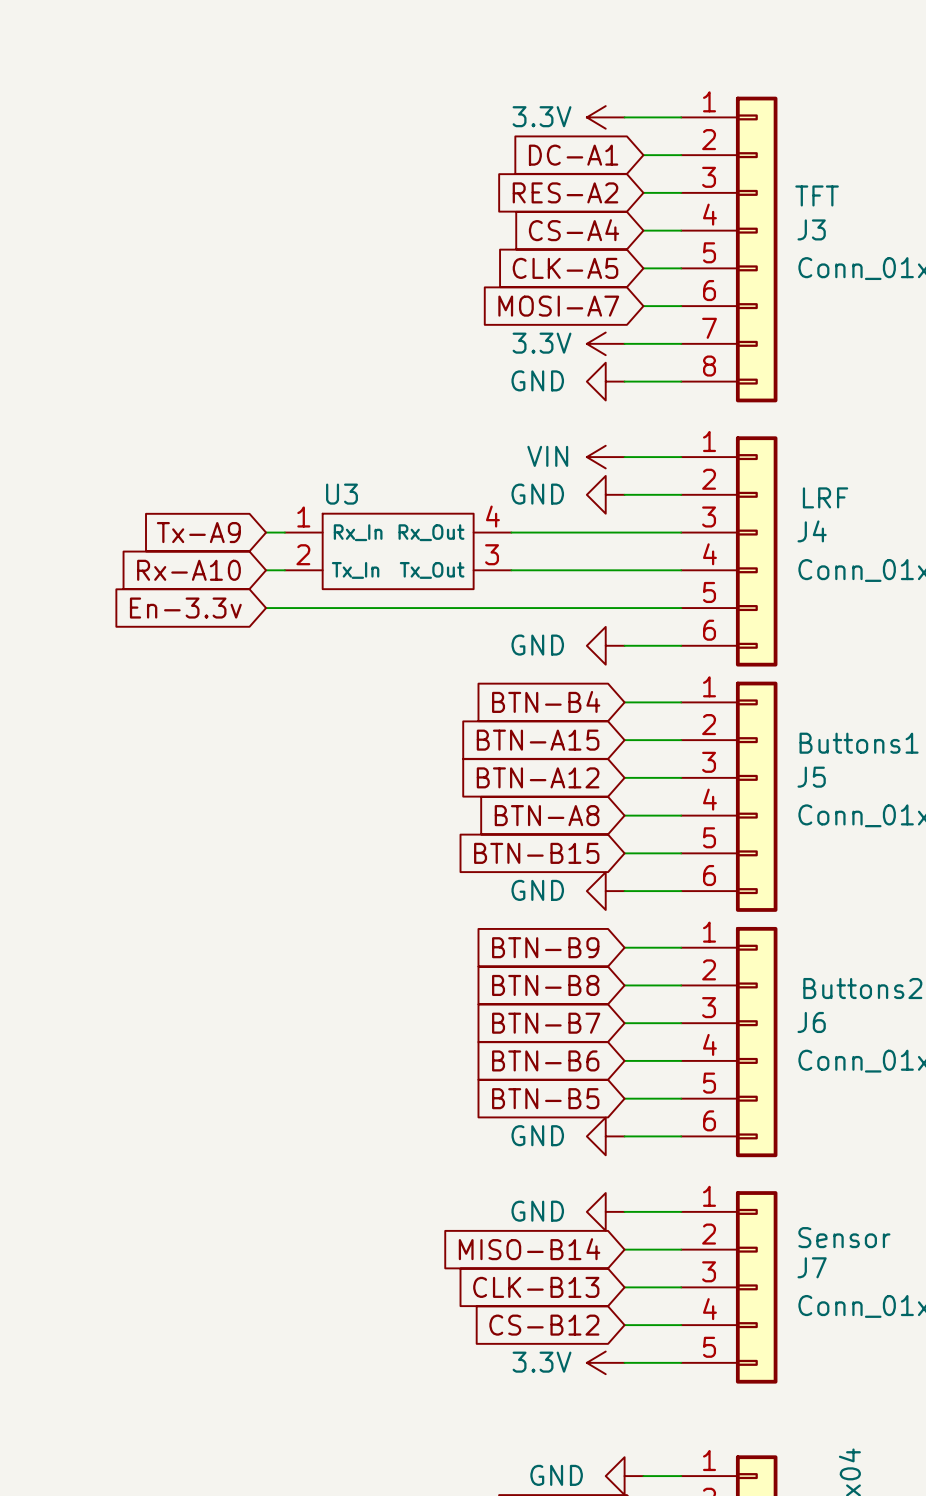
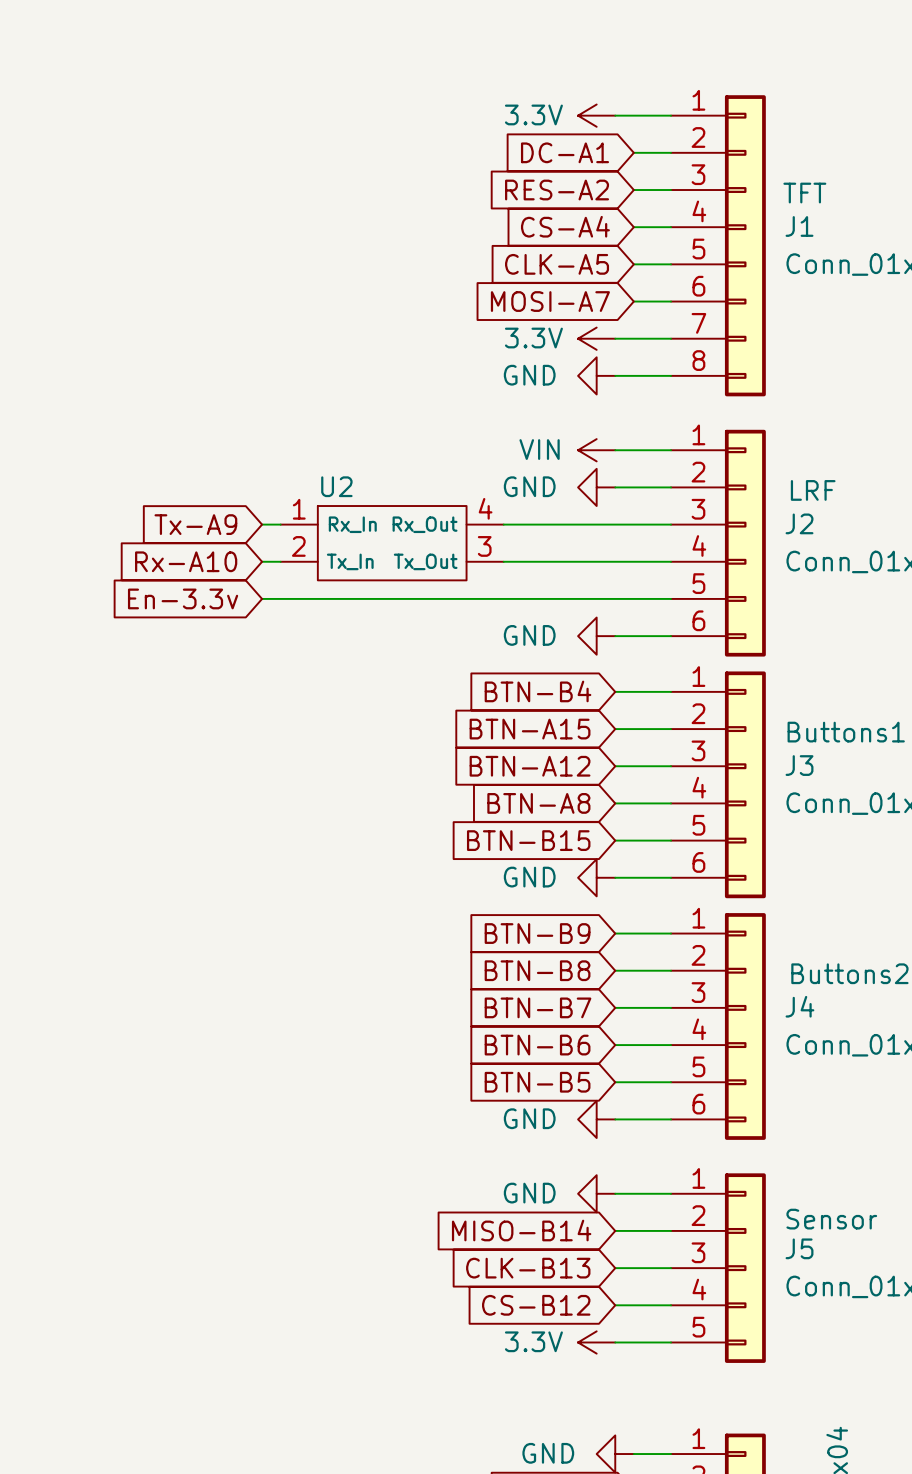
J3 name: J3 (811, 229) -> J1 (799, 226)
U3 name: U3 (341, 494) -> U2 (336, 486)
J4 name: J4 (812, 531) -> J2 (799, 523)
J5 name: J5 (811, 777) -> J3 (799, 765)
J6 name: J6 (811, 1022) -> J4 (799, 1006)
J7 name: J7 (812, 1267) -> J5 (799, 1248)

